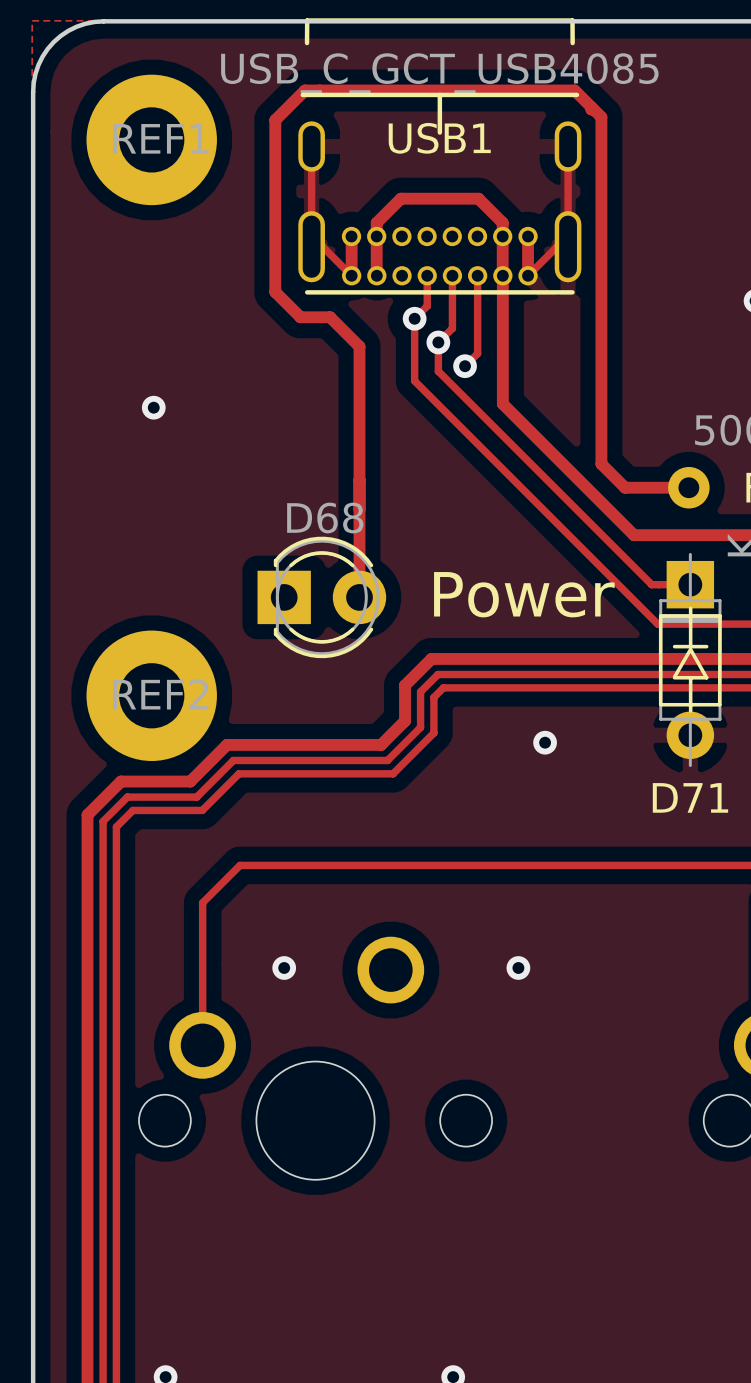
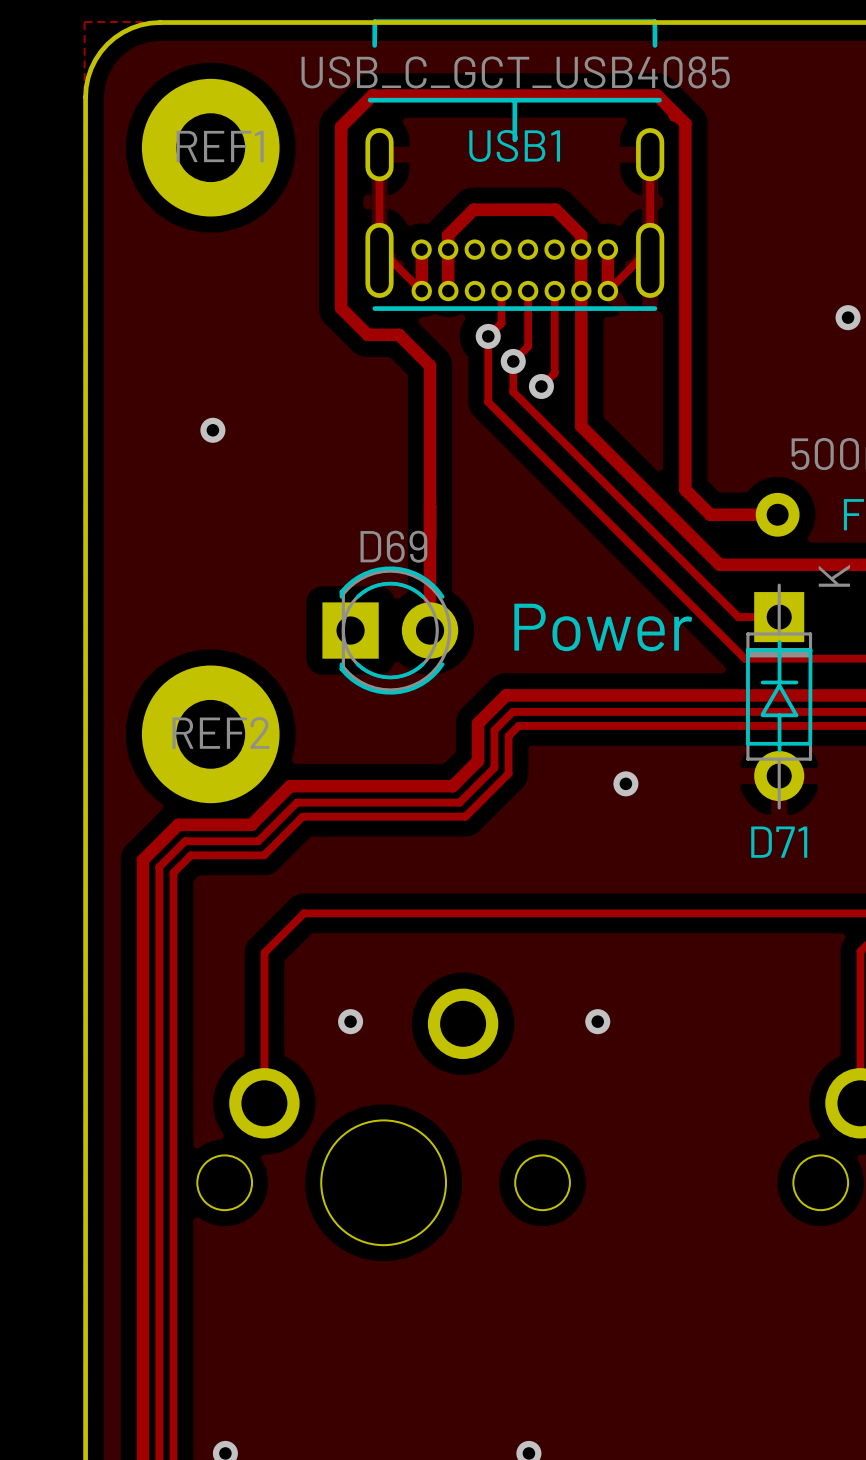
D68 name: D68 (325, 518) -> D69 (393, 546)

